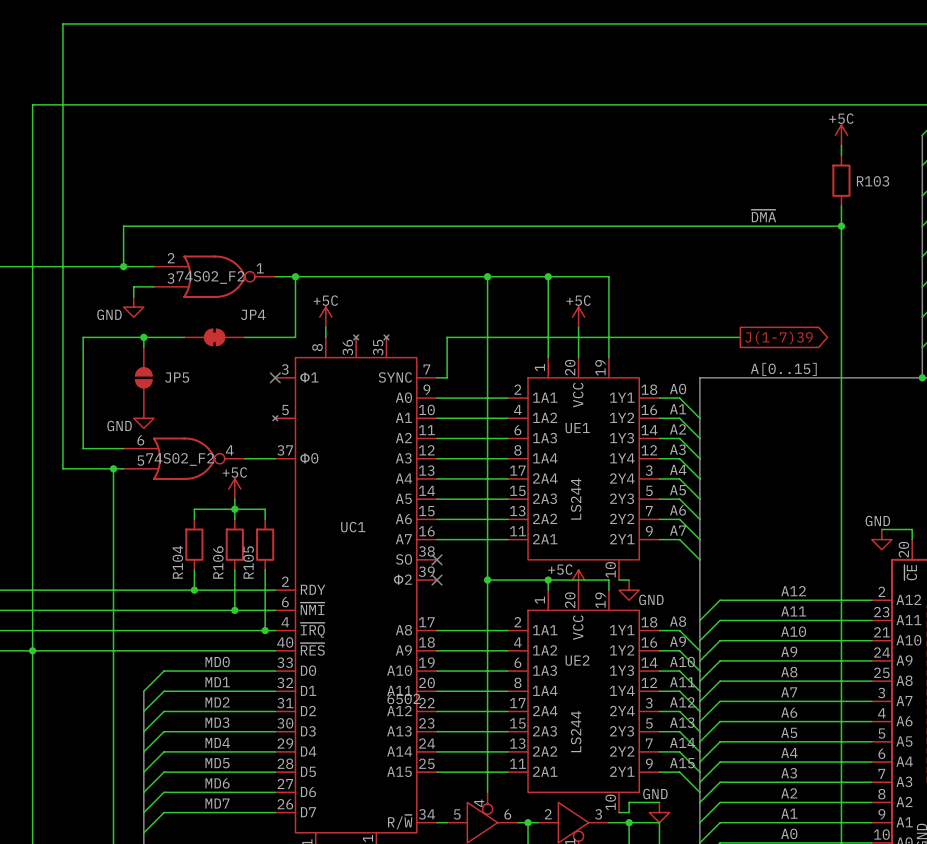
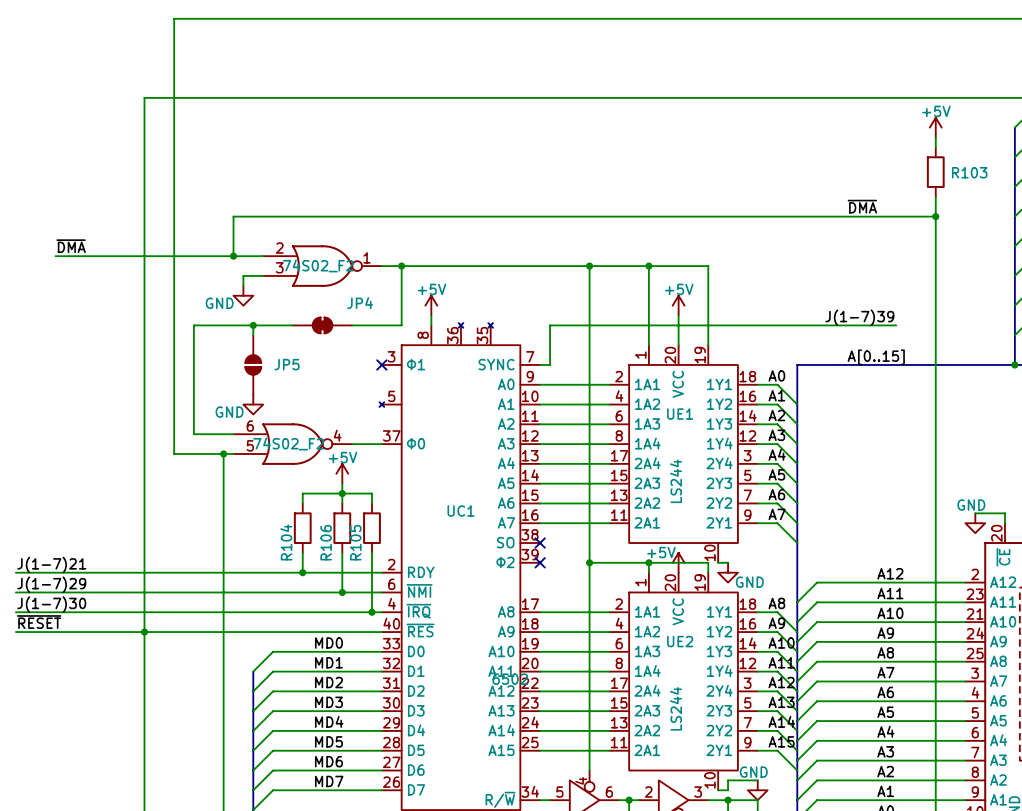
power symbol: +5C (841, 135) -> +5V (935, 127)
power symbol: +5C (325, 317) -> +5V (431, 305)
power symbol: +5C (578, 317) -> +5V (678, 305)
label: none -> J(1-7)39 (859, 317)
wire: none -> (836, 325) (896, 325)
global label: J(1-7)39 (778, 337) -> none
power symbol: +5C (234, 489) -> +5V (342, 473)
power symbol: +5C (578, 580) -> +5V (678, 562)

